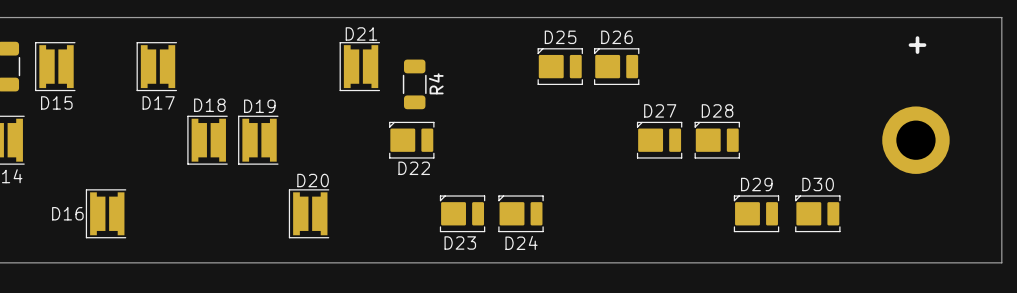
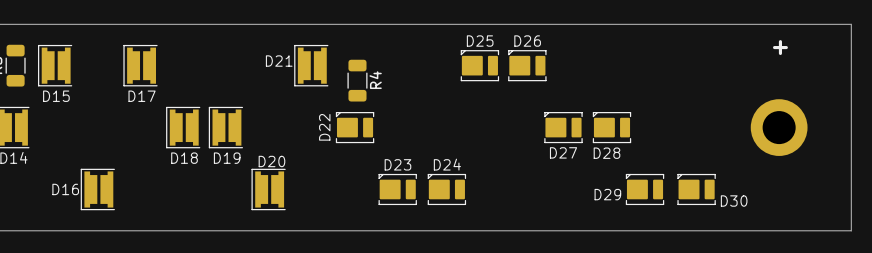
D21 name position: D21 (361, 33) -> D21 (279, 61)
D18 name position: D18 (209, 105) -> D18 (184, 158)
D19 name position: D19 (259, 106) -> D19 (227, 158)
D27 name position: D27 (660, 110) -> D27 (563, 152)
D28 name position: D28 (717, 110) -> D28 (606, 153)
D22 name rotation: 0° (414, 168) -> 90° counterclockwise (324, 127)
D22 name position: D22 (414, 168) -> D22 (324, 127)
D29 name position: D29 (756, 184) -> D29 (607, 194)
D30 name position: D30 (818, 184) -> D30 (734, 201)
D23 name position: D23 (460, 242) -> D23 (397, 164)
D24 name position: D24 (521, 242) -> D24 (447, 164)

